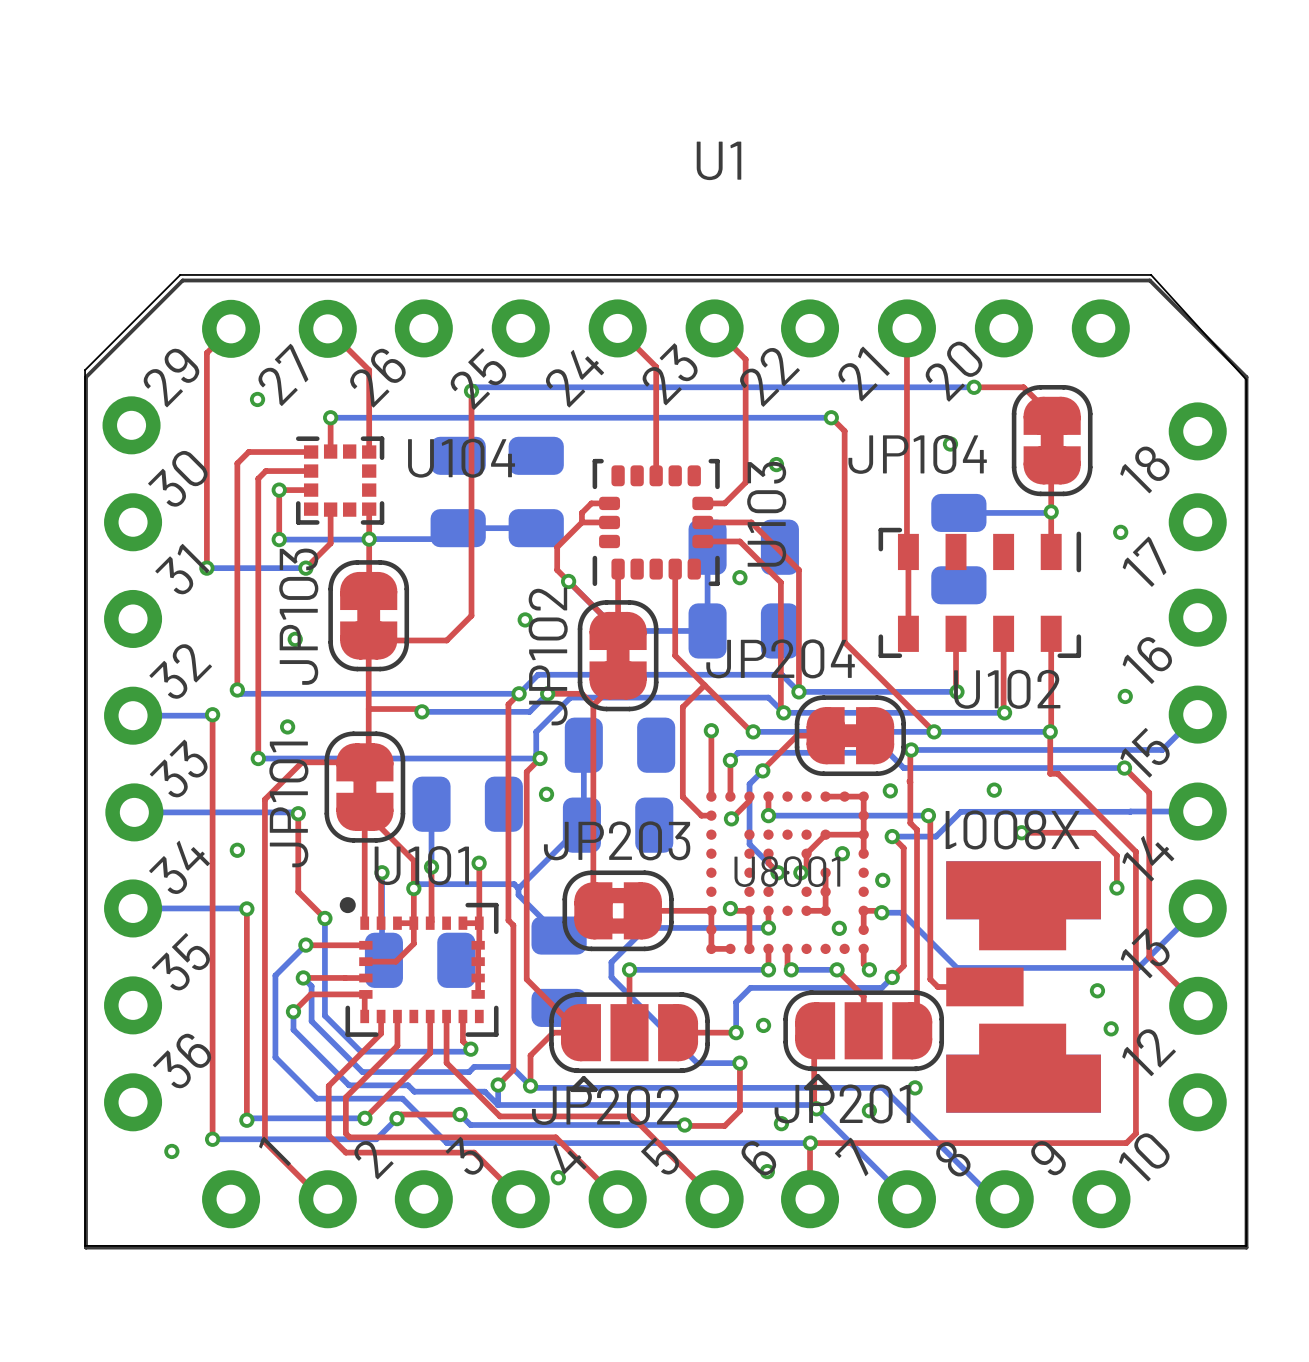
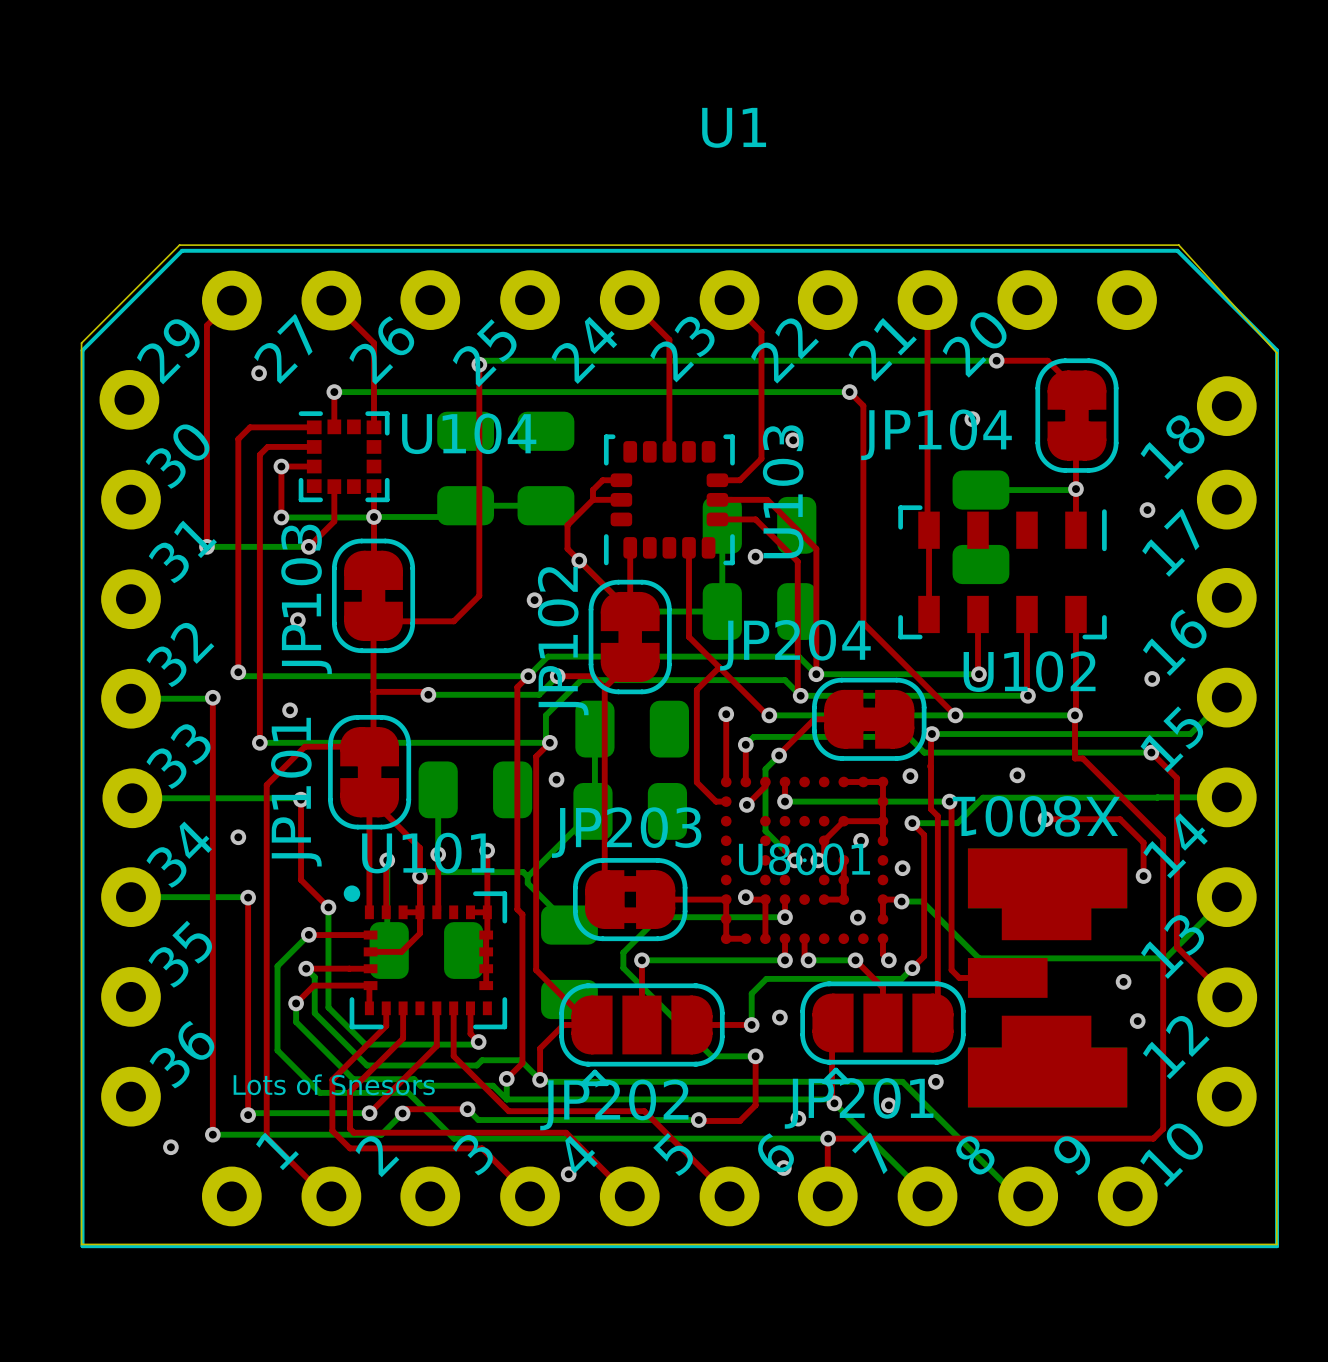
text: none -> Lots of Snesors (334, 1084)

